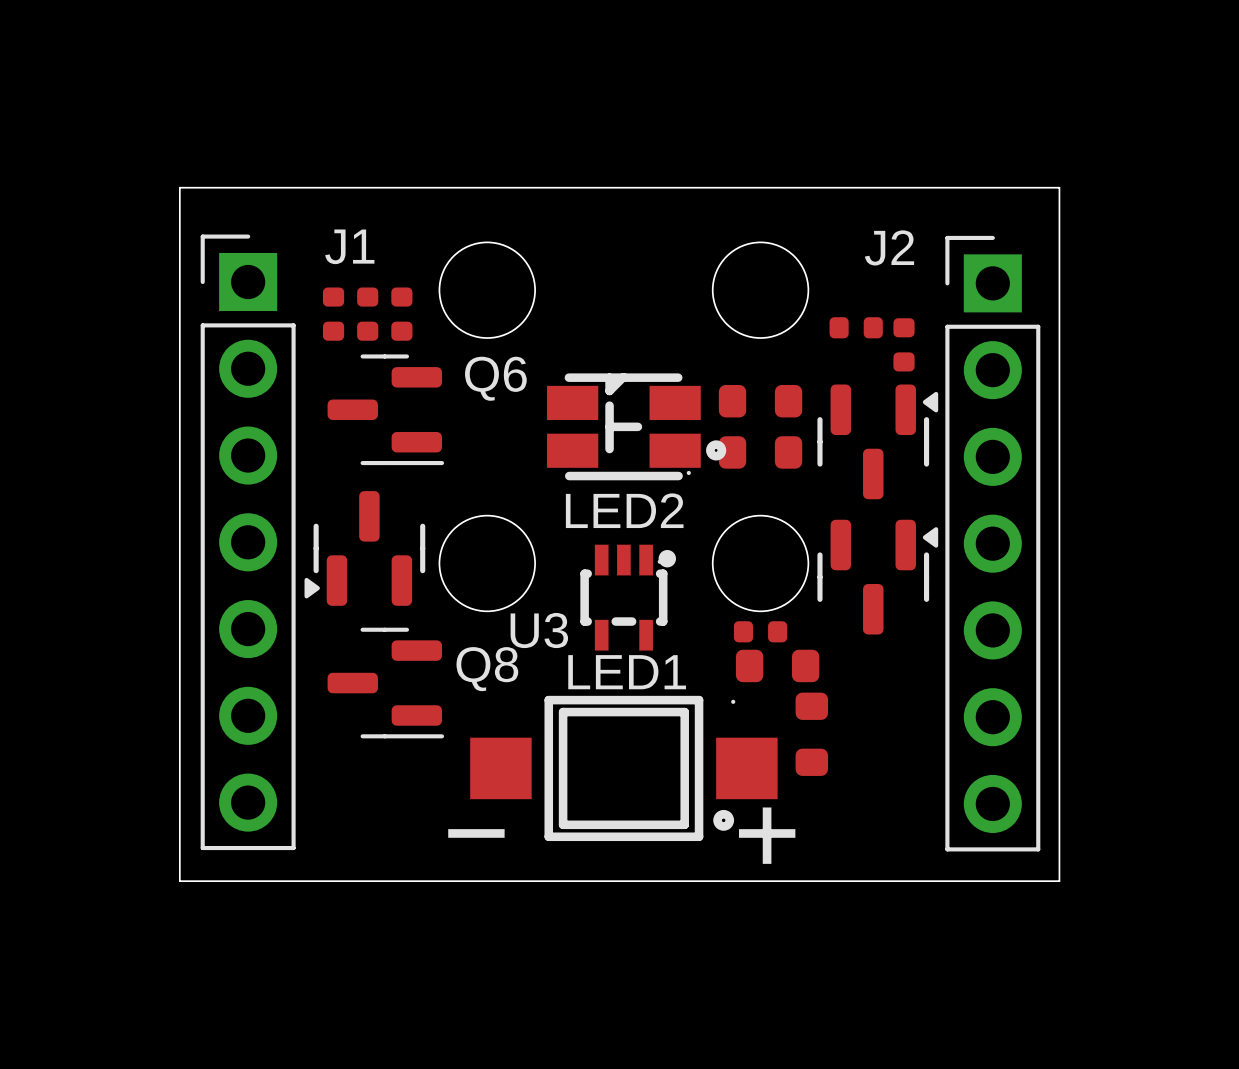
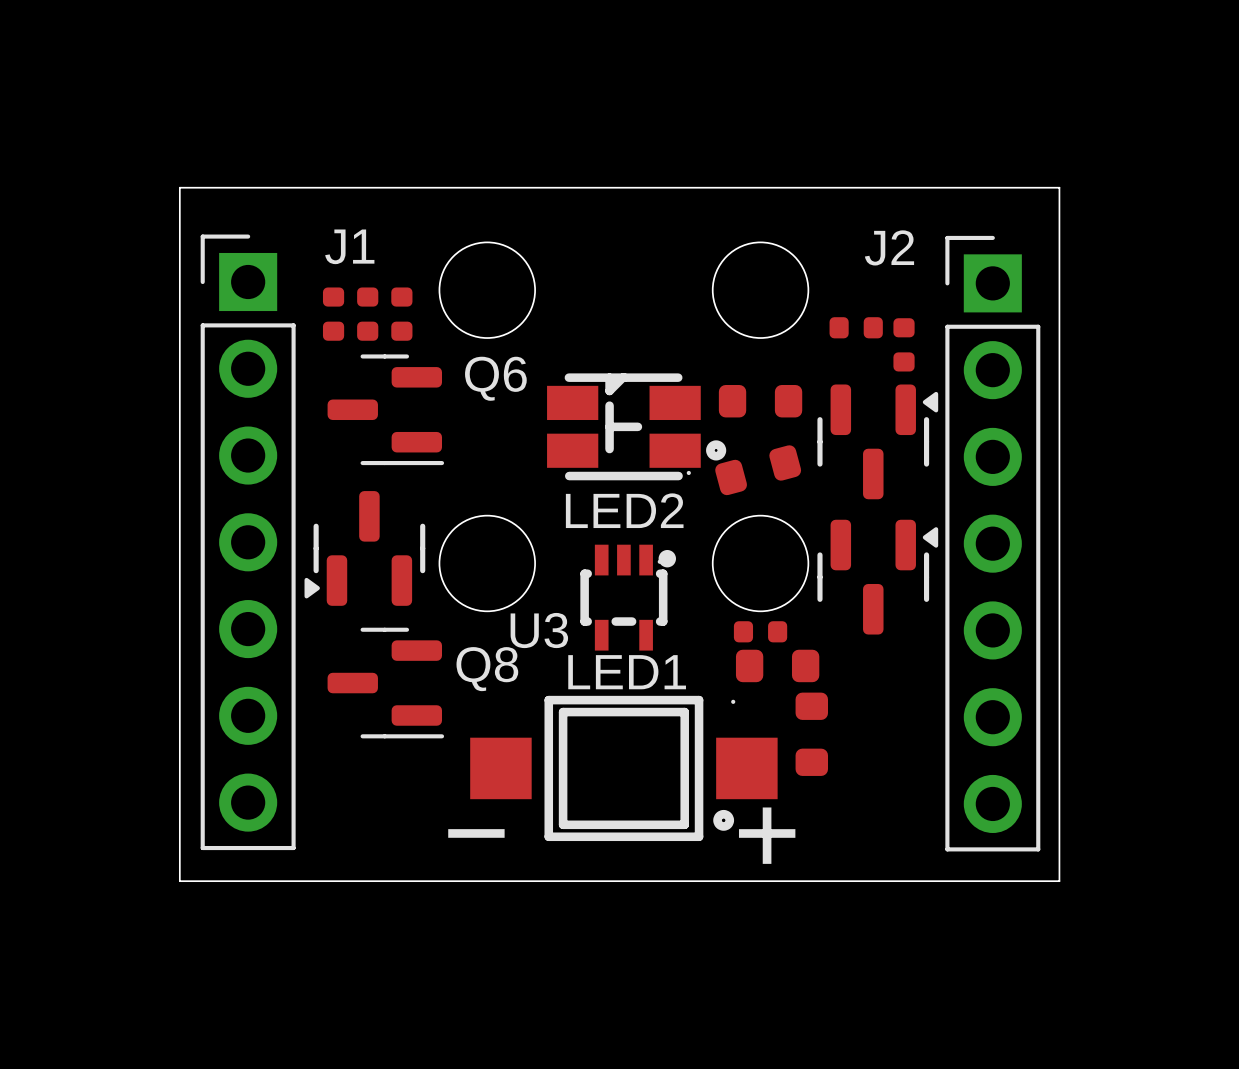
part rotation: 0° (760, 452) -> 15° counterclockwise (758, 470)

